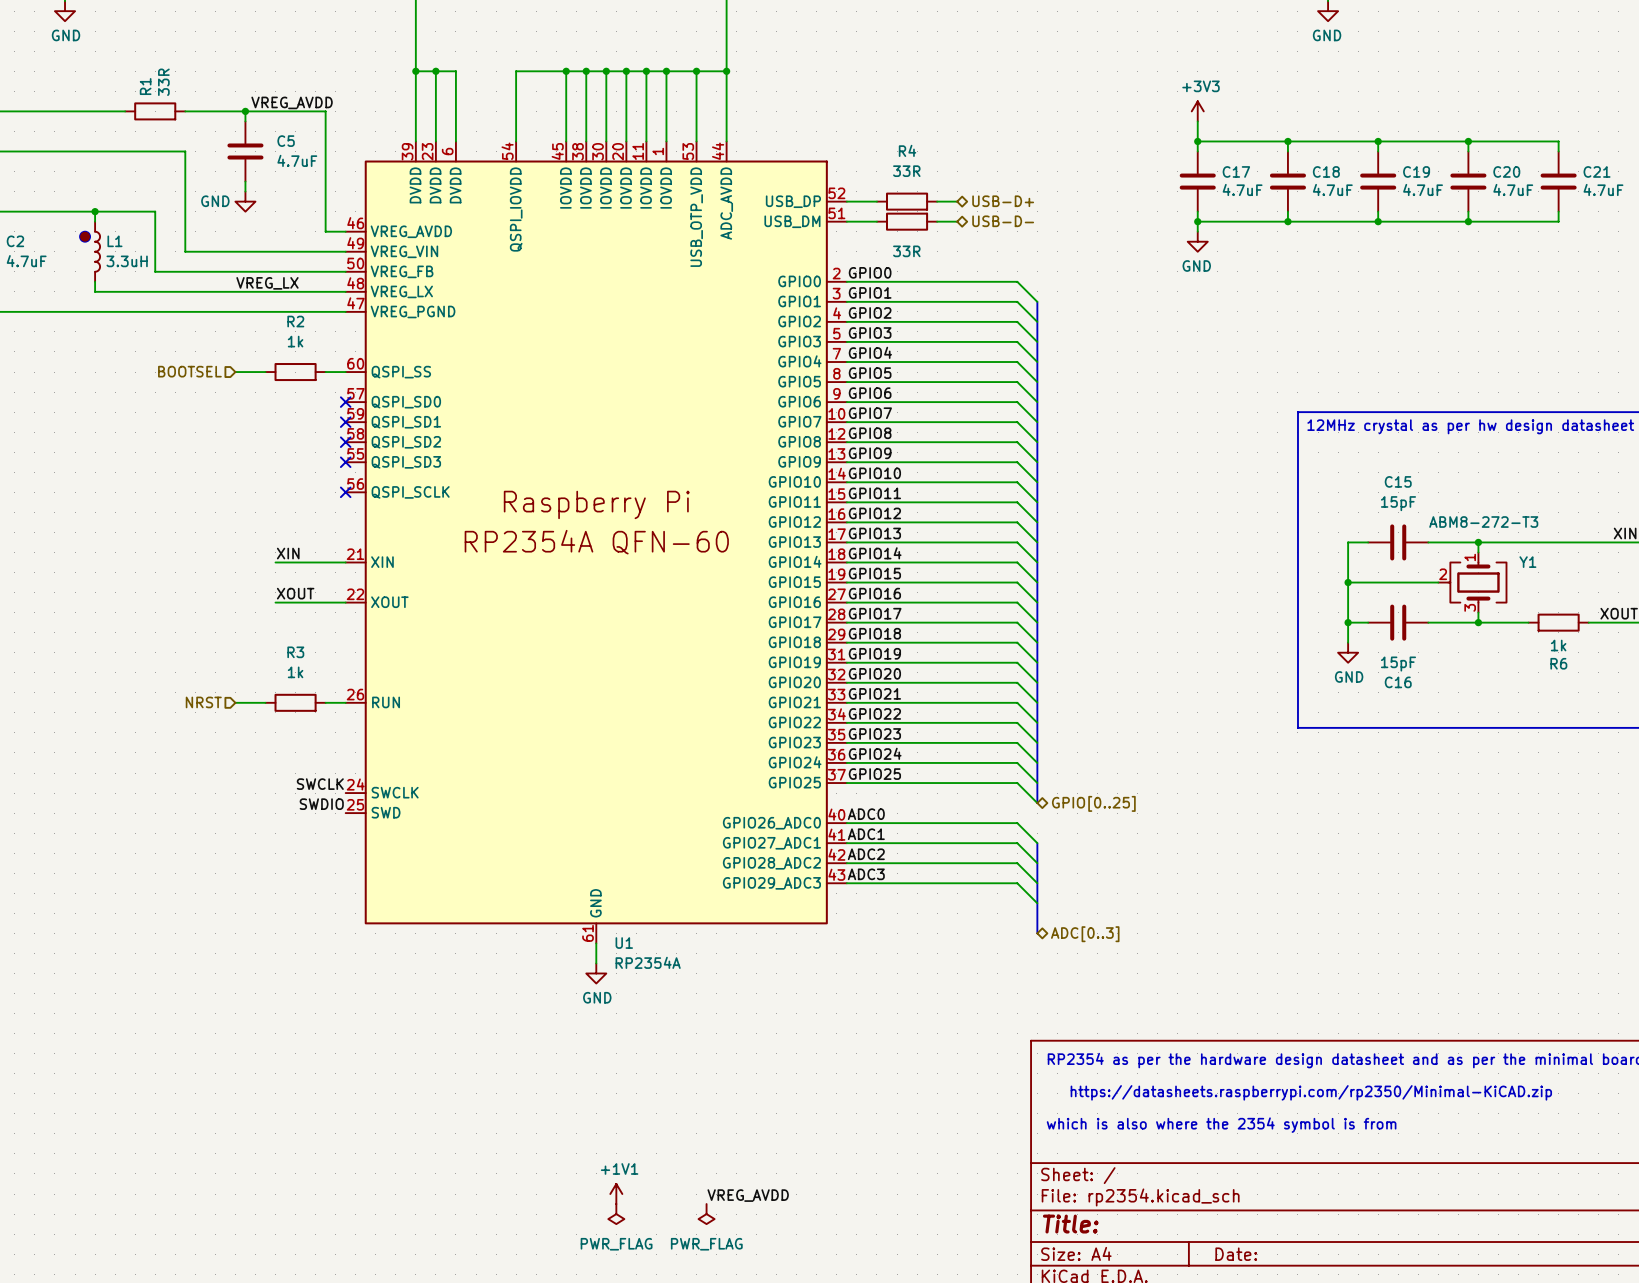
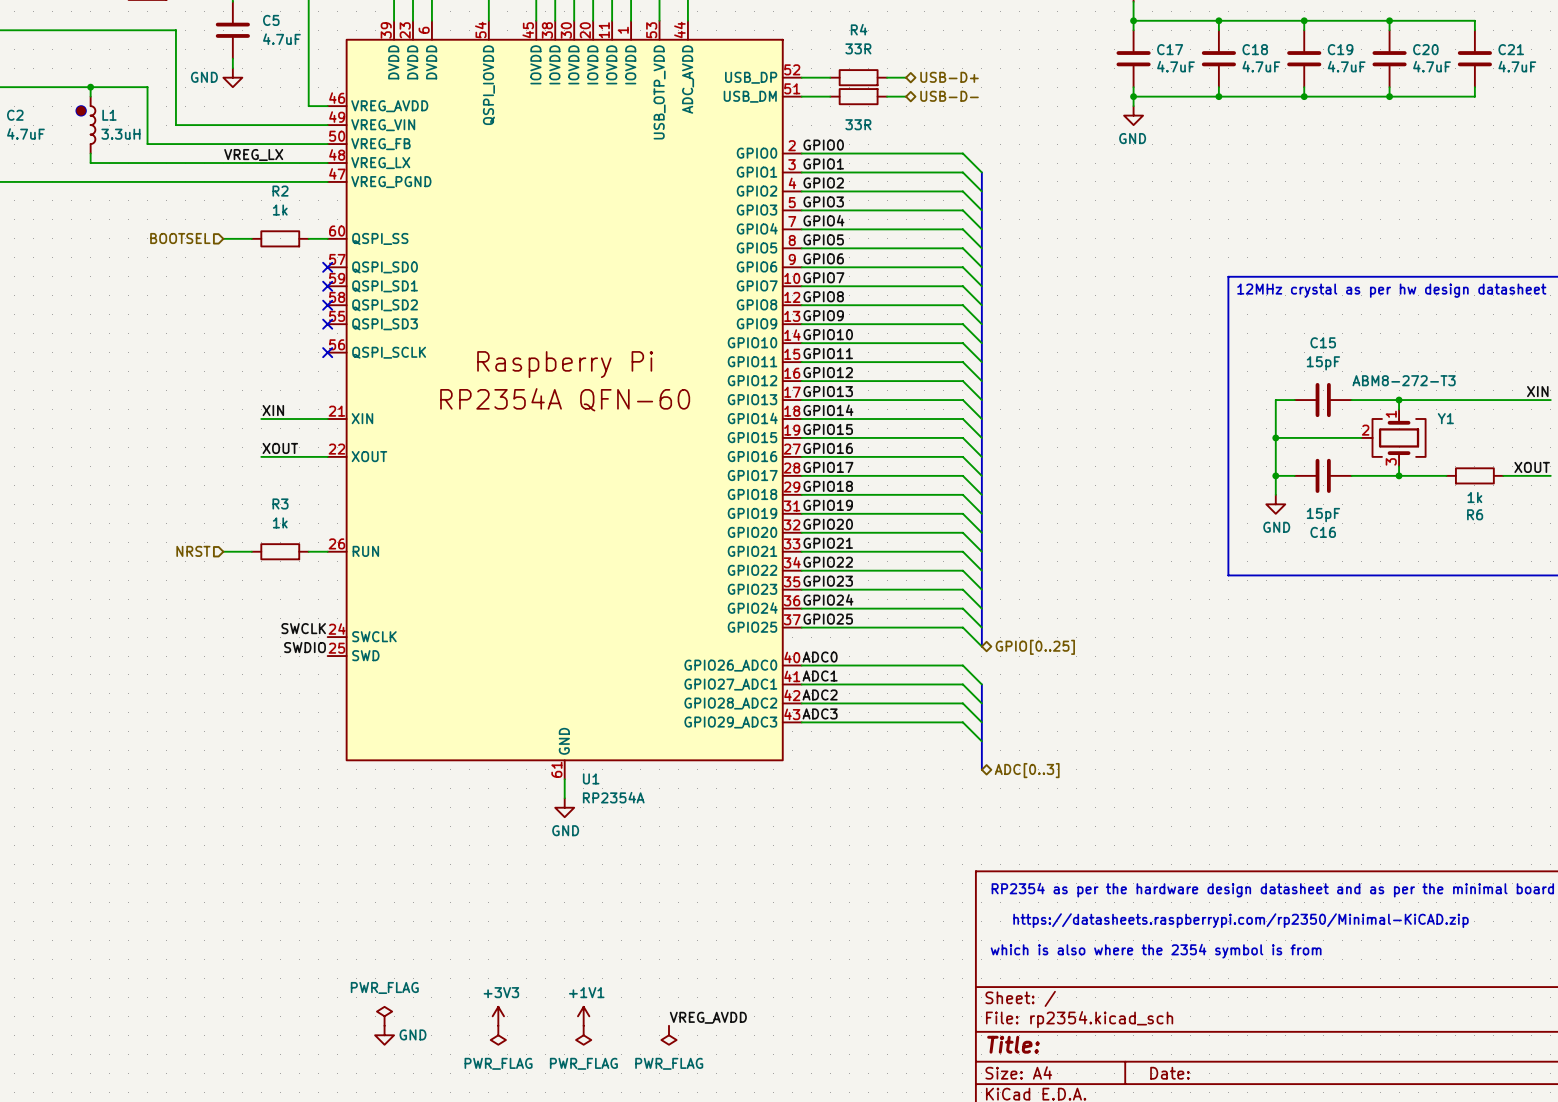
power symbol: none -> PWR_FLAG (384, 1016)
power symbol: none -> +3V3 (498, 1016)
power symbol: none -> GND (384, 1035)
power symbol: none -> PWR_FLAG (498, 1035)

